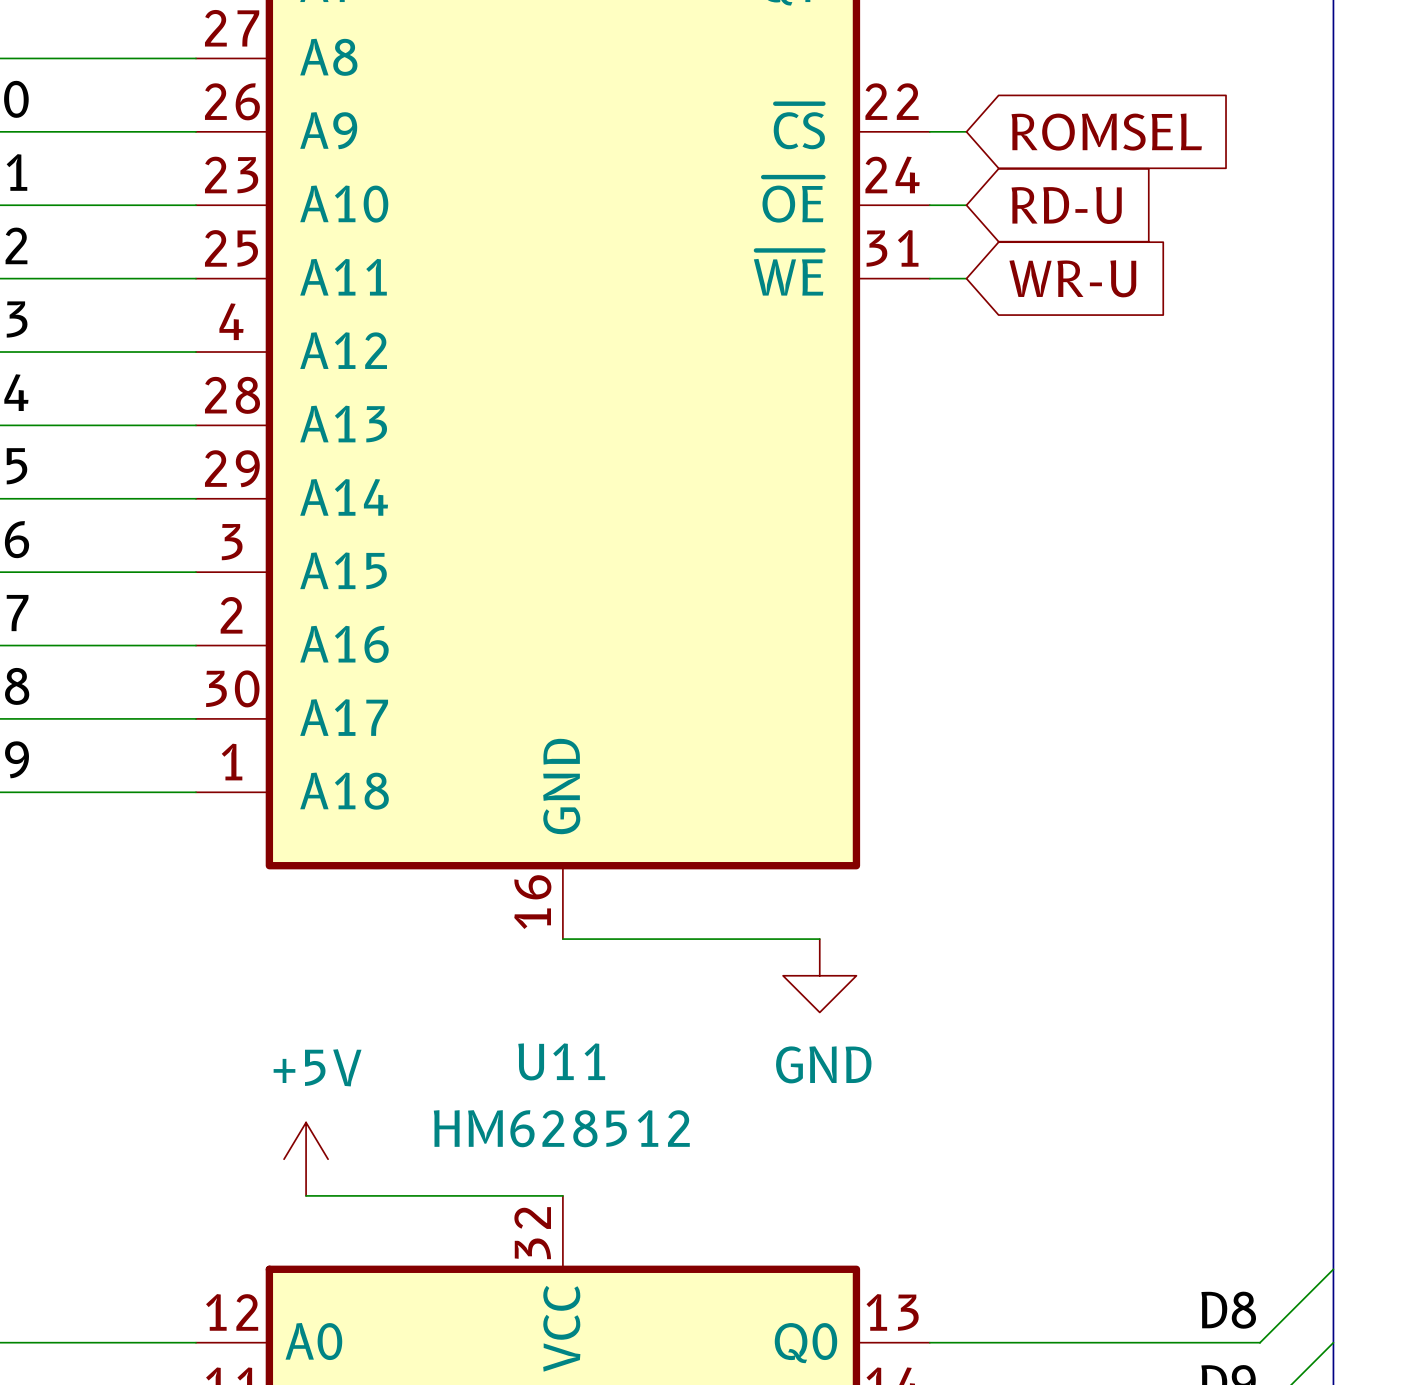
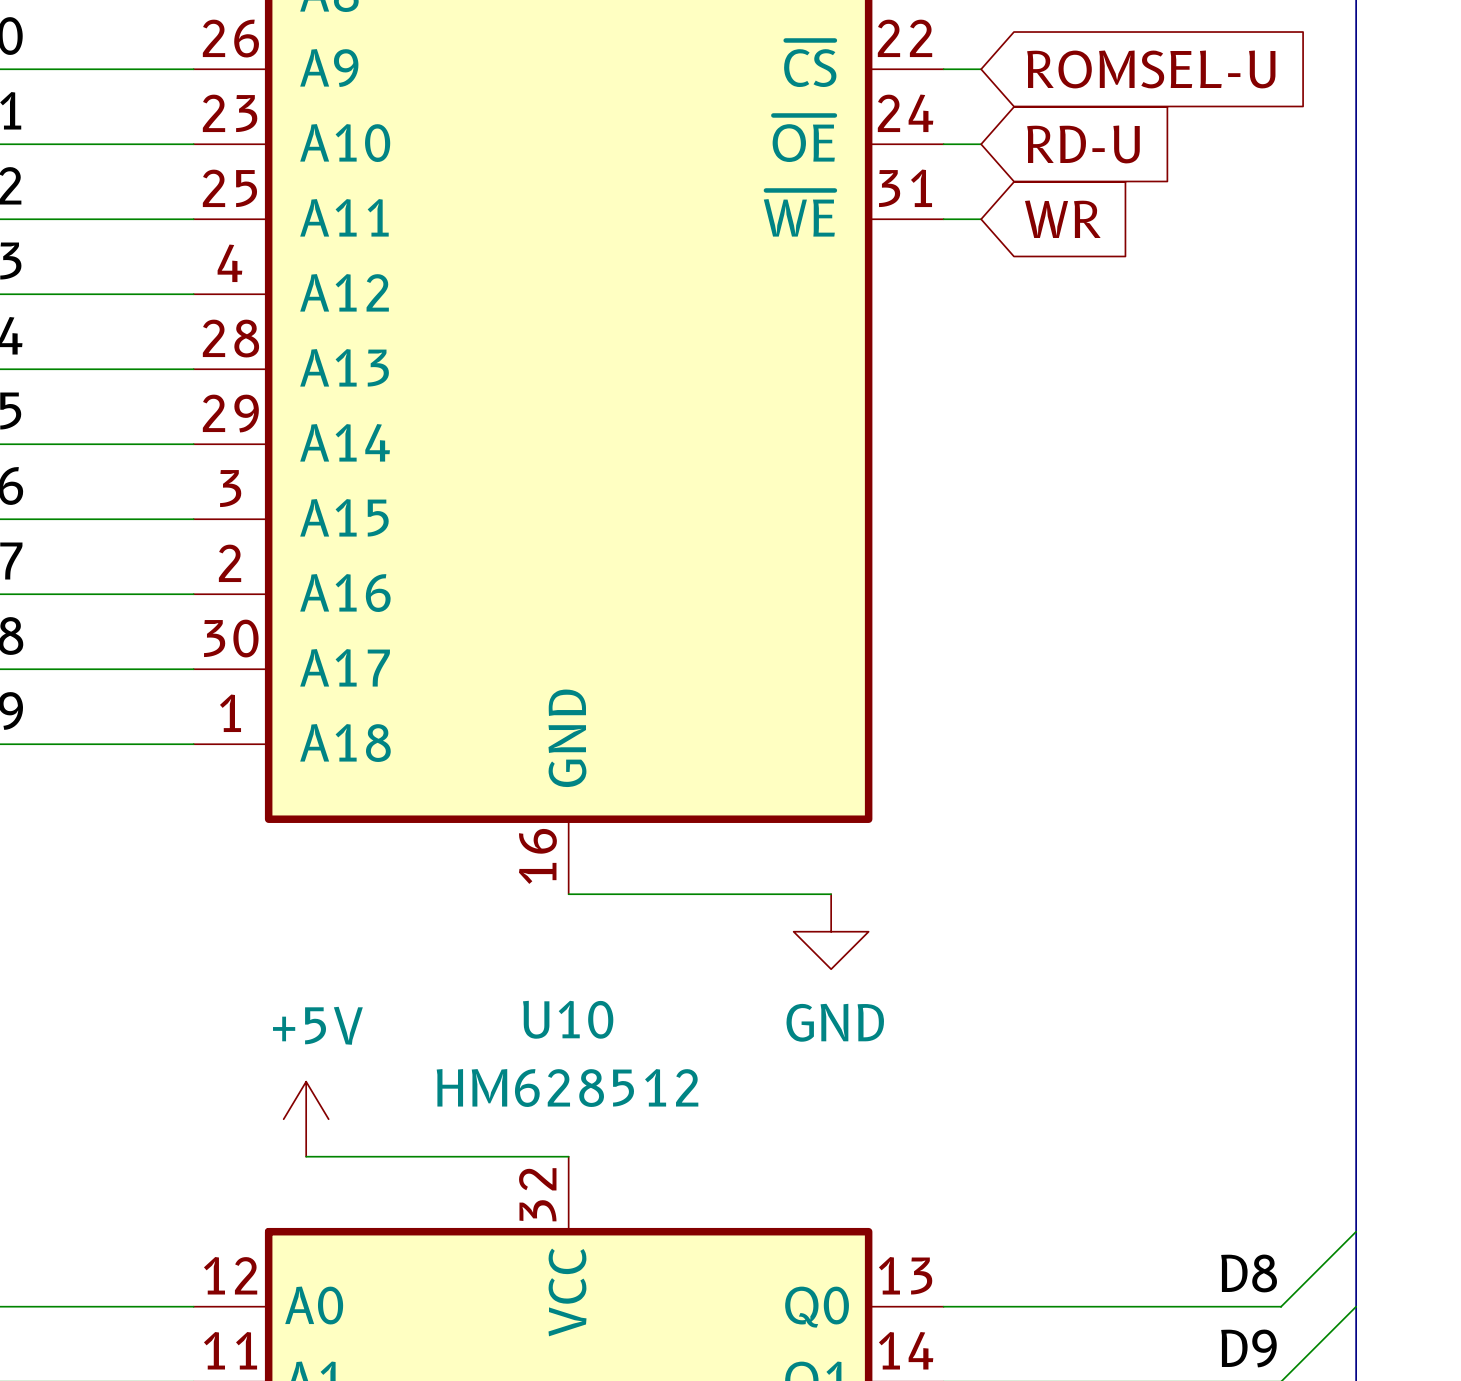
global label: ROMSEL (1106, 132) -> ROMSEL-U (1151, 69)
global label: WR-U (1072, 278) -> WR (1062, 219)
U11 name: U11 (561, 1061) -> U10 (568, 1019)

